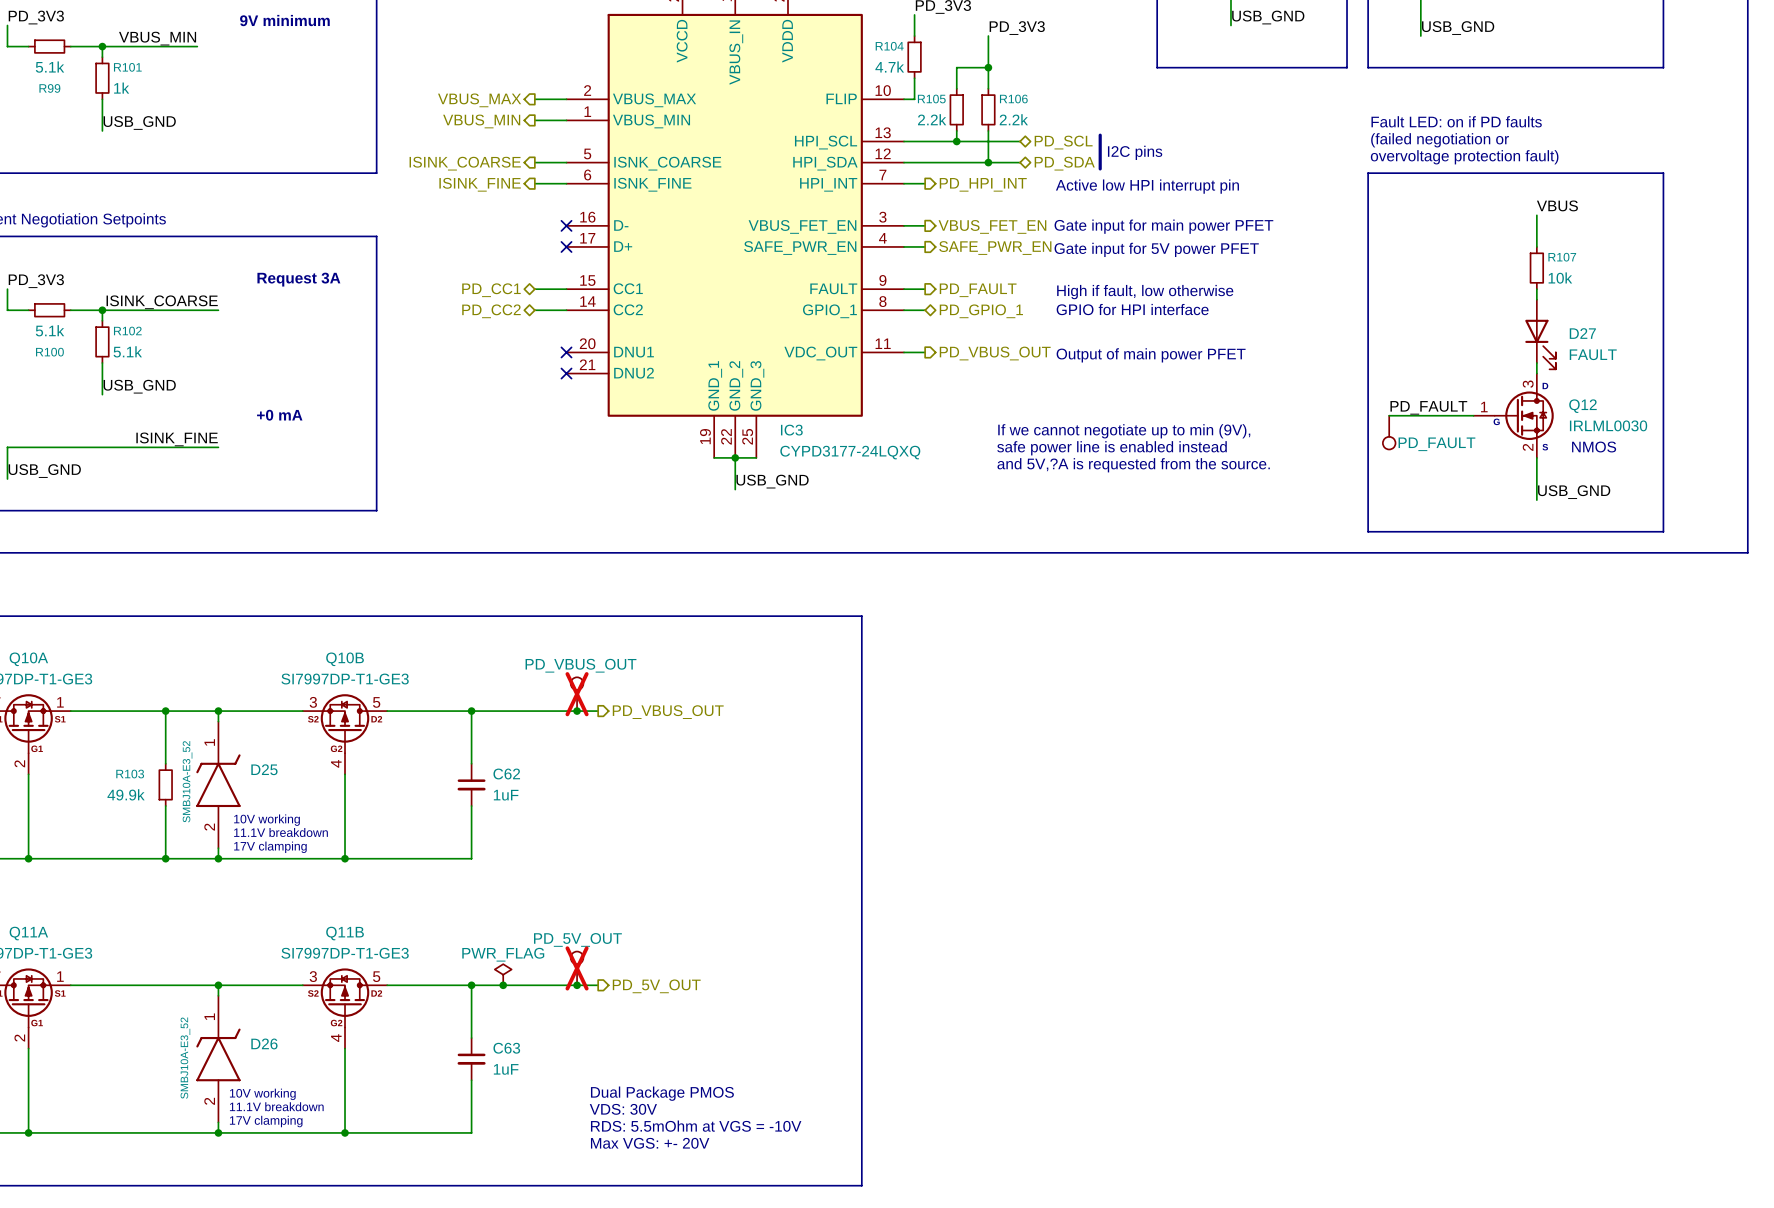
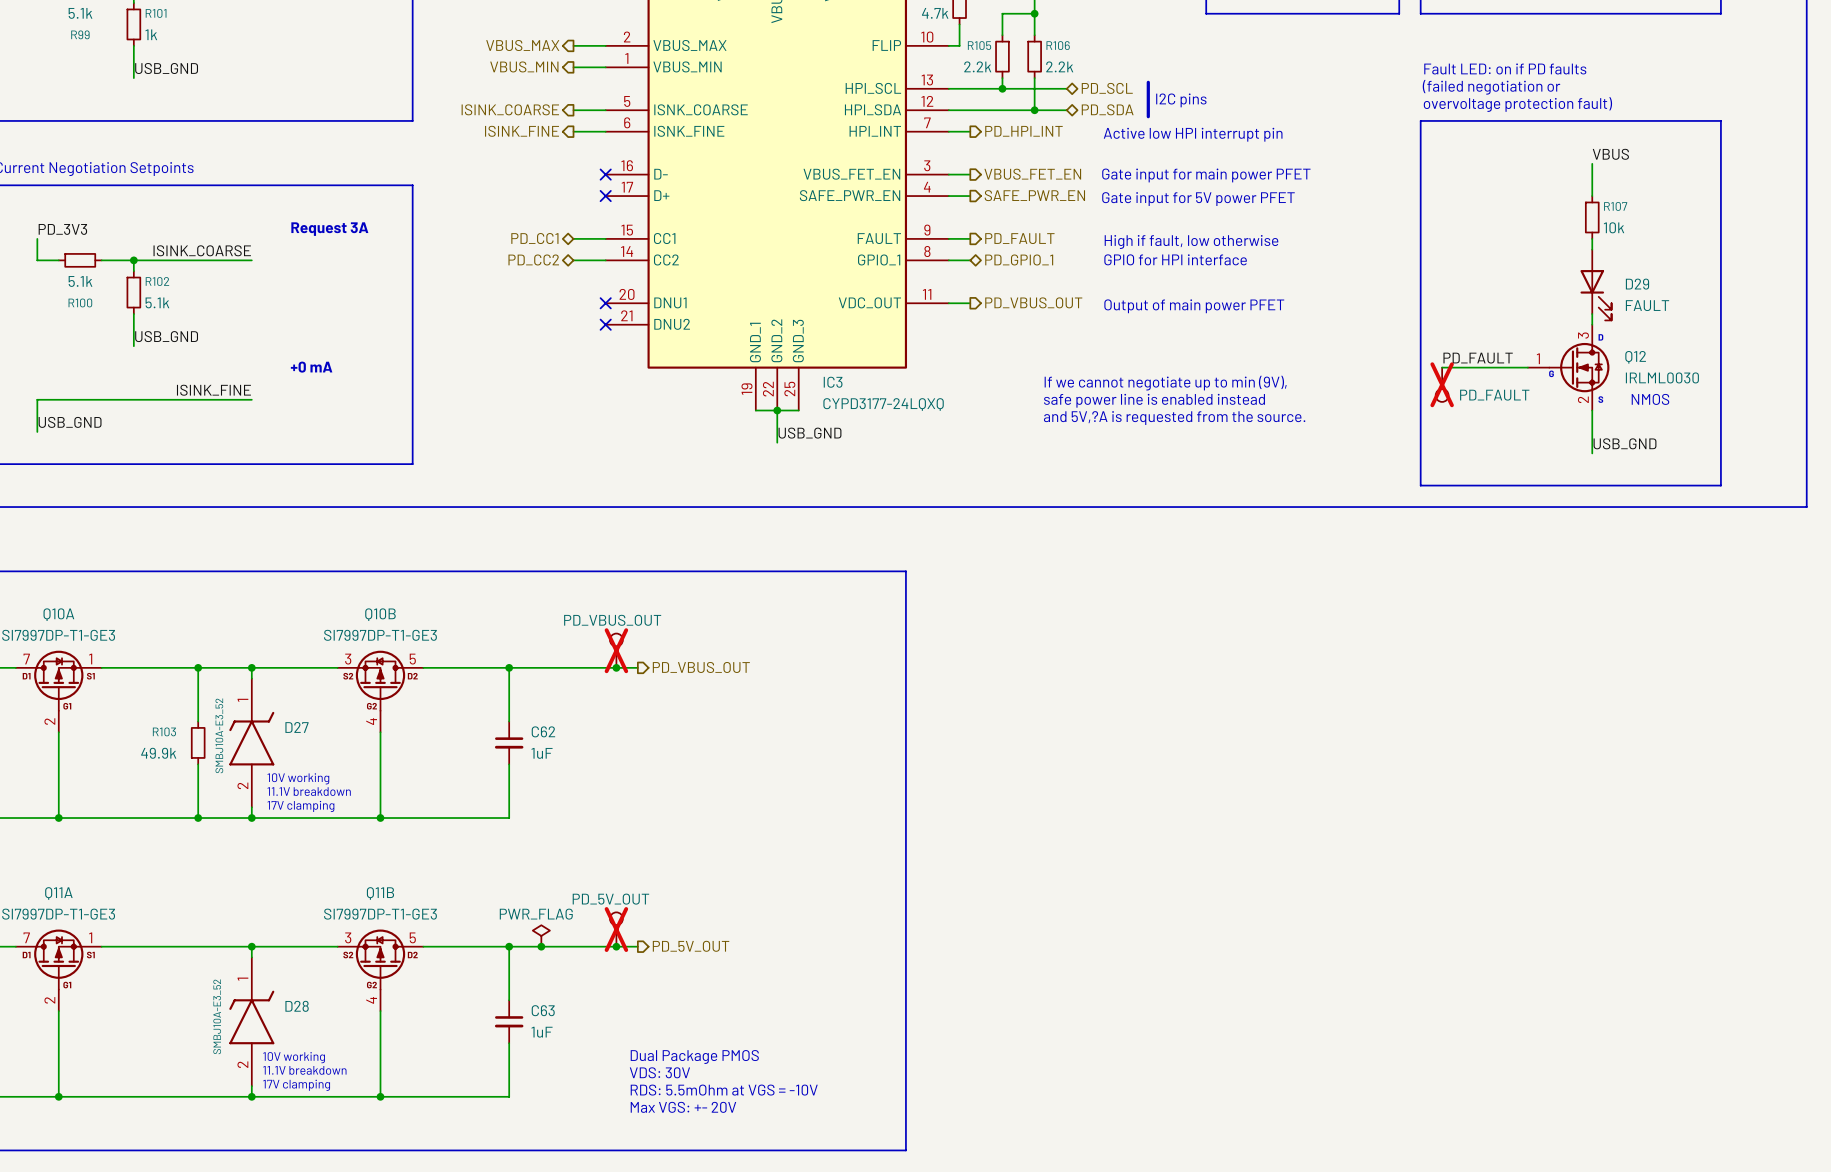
D27 name: D27 (1582, 333) -> D29 (1637, 284)
part do-not-place cross: none -> (1442, 384)
D25 name: D25 (264, 769) -> D27 (296, 727)
D26 name: D26 (264, 1043) -> D28 (297, 1006)

